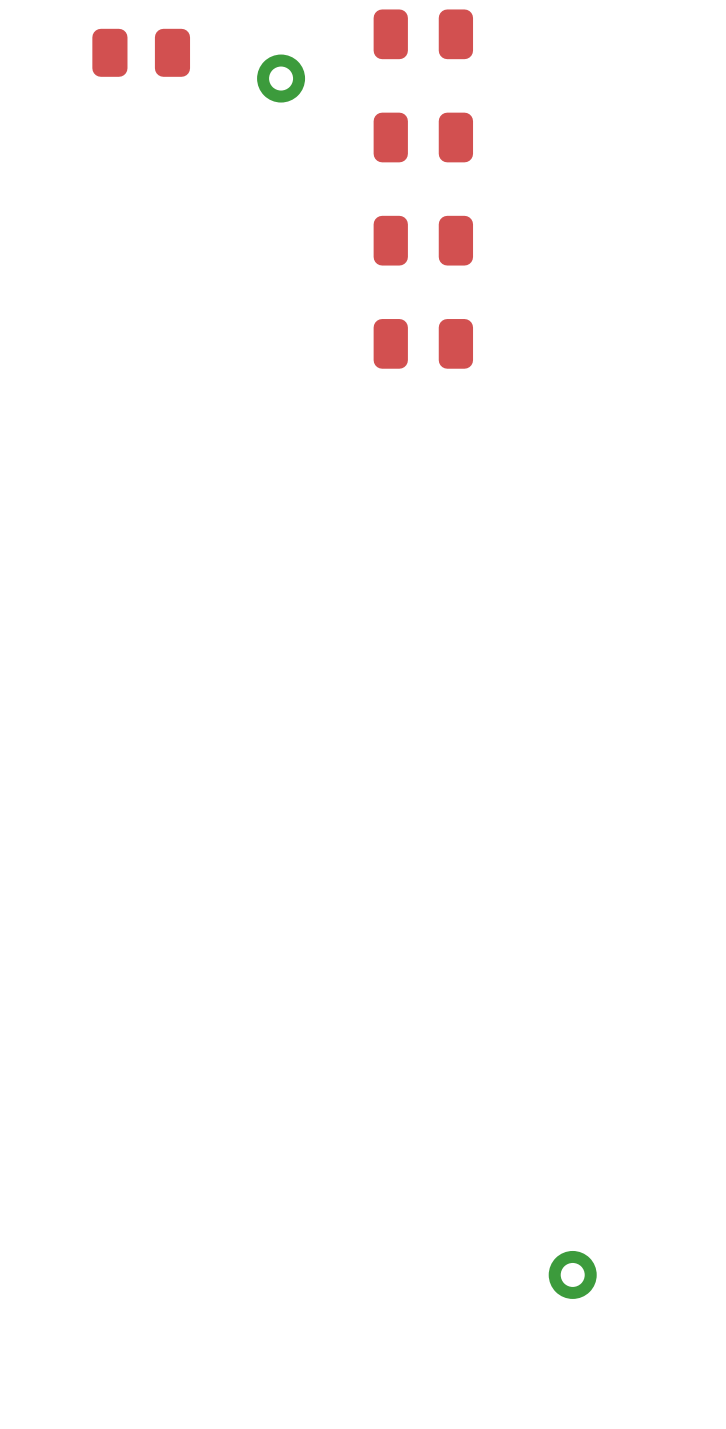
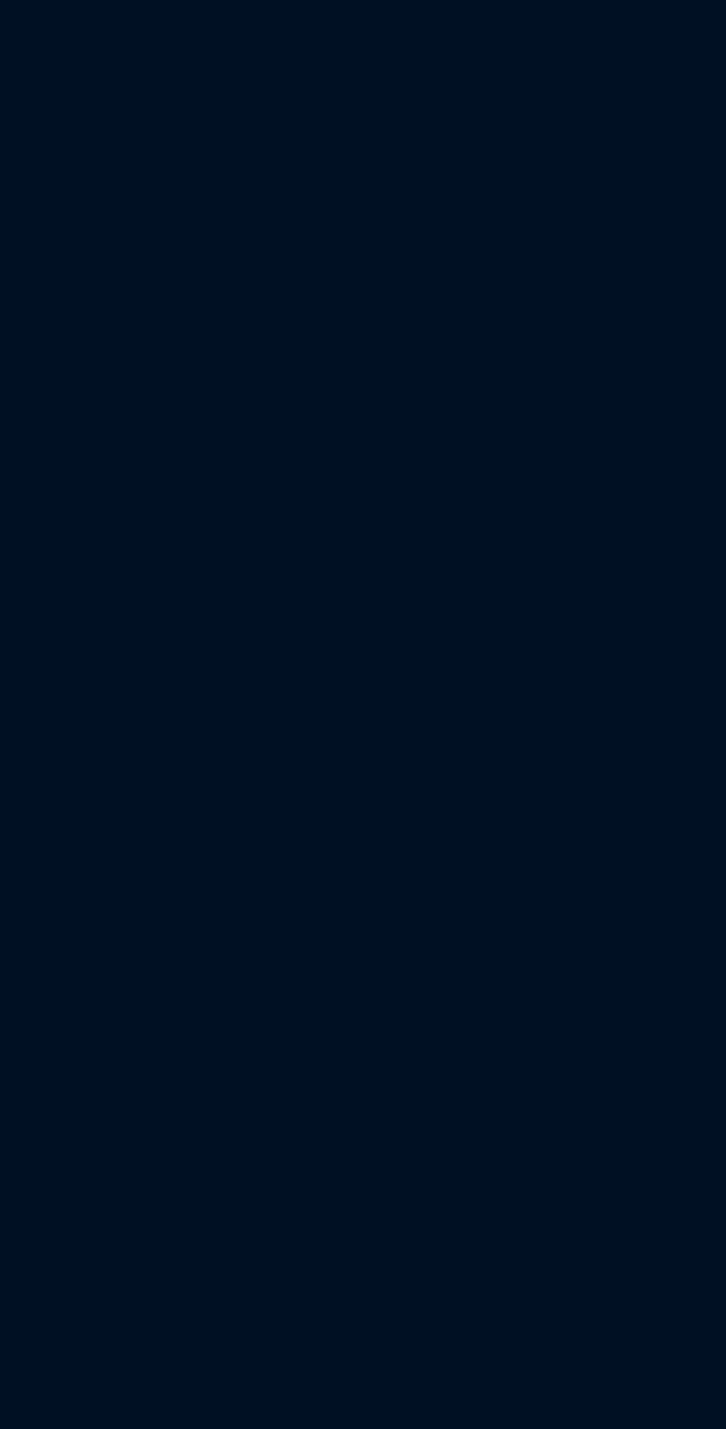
part: (423, 34) -> none
part: (141, 52) -> none
part: (281, 78) -> none
part: (423, 137) -> none
part: (423, 240) -> none
part: (423, 343) -> none
part: (572, 1274) -> none

